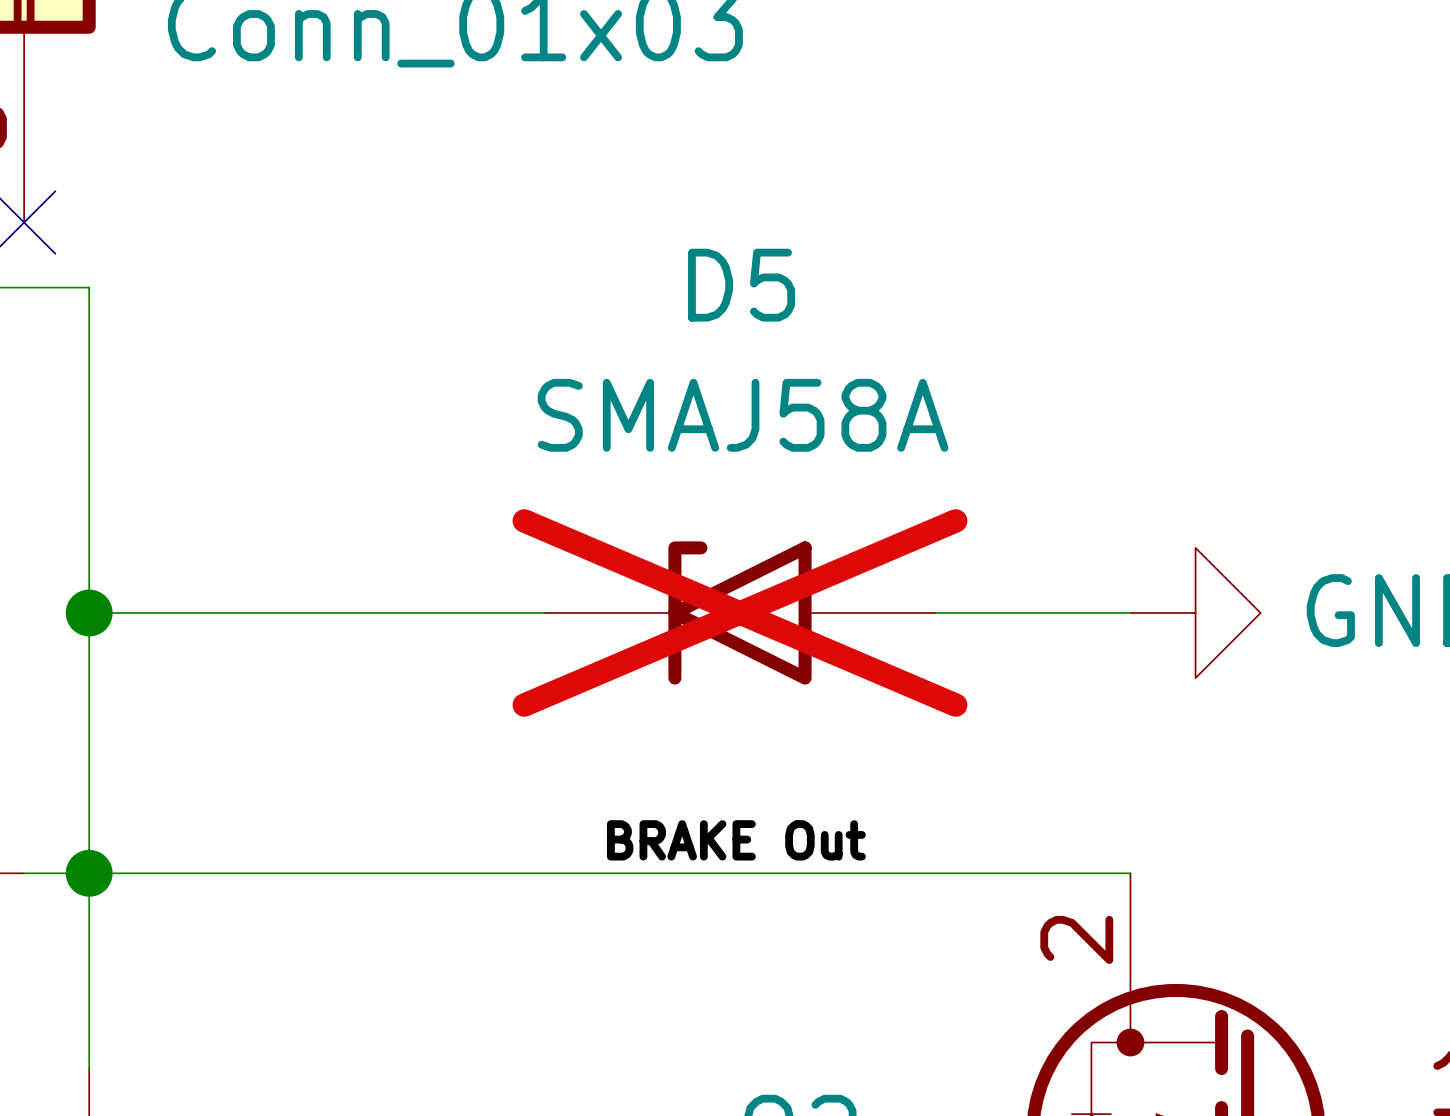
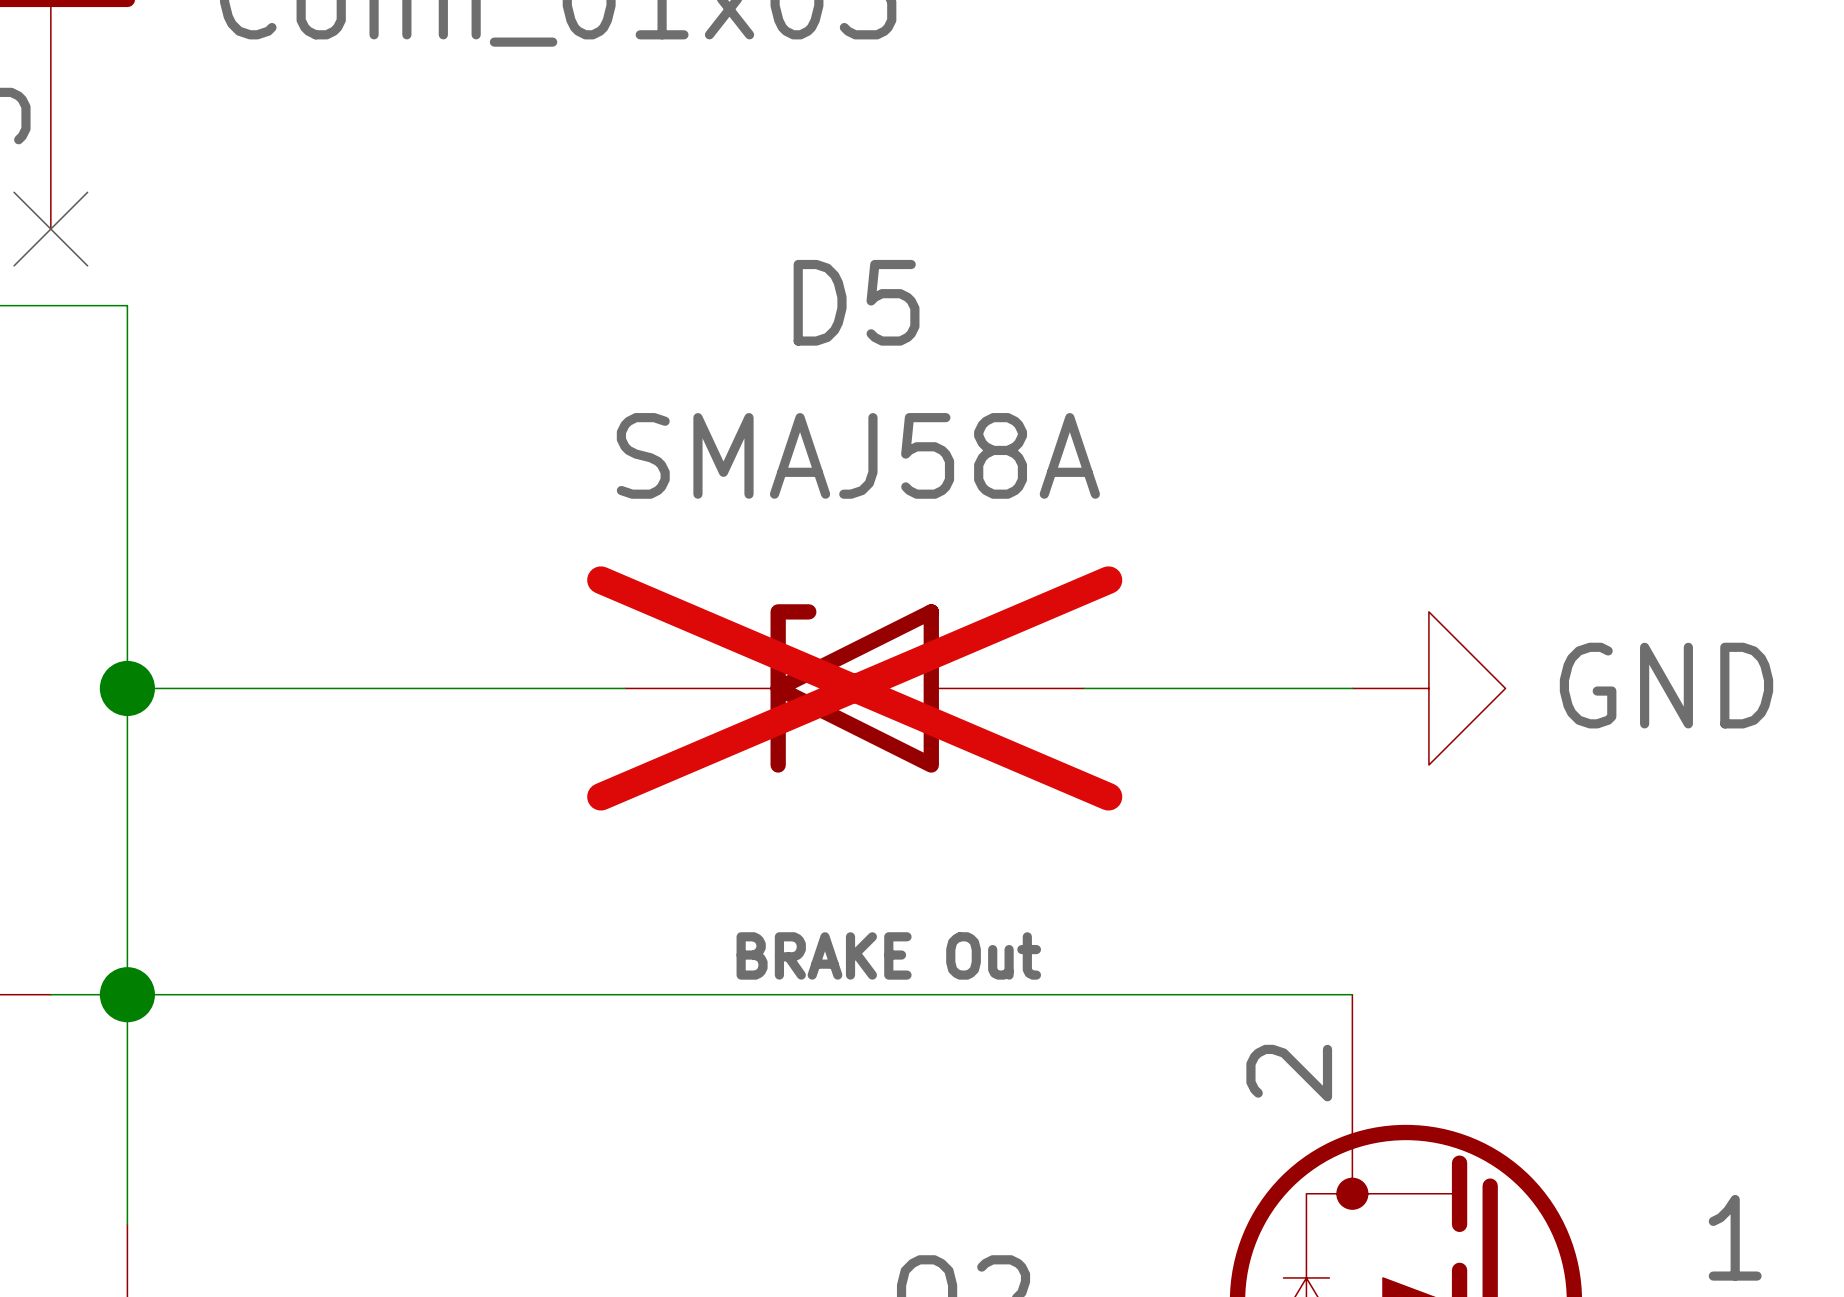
D5 position: (739, 612) -> (854, 688)

